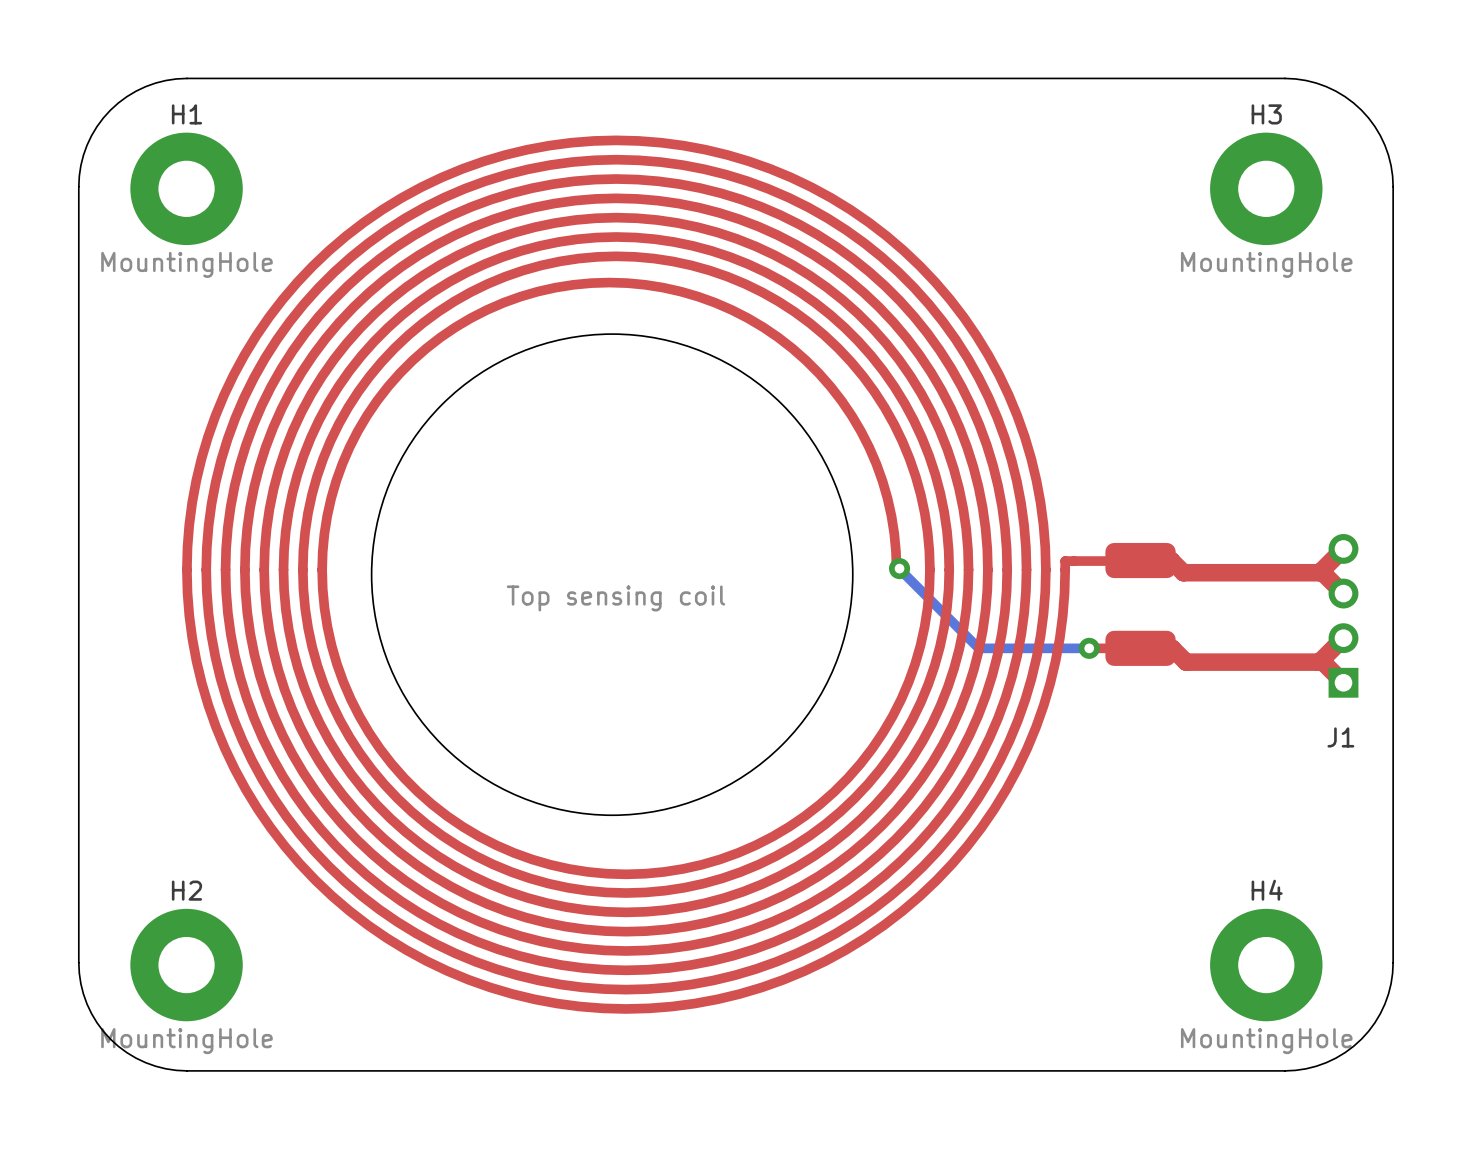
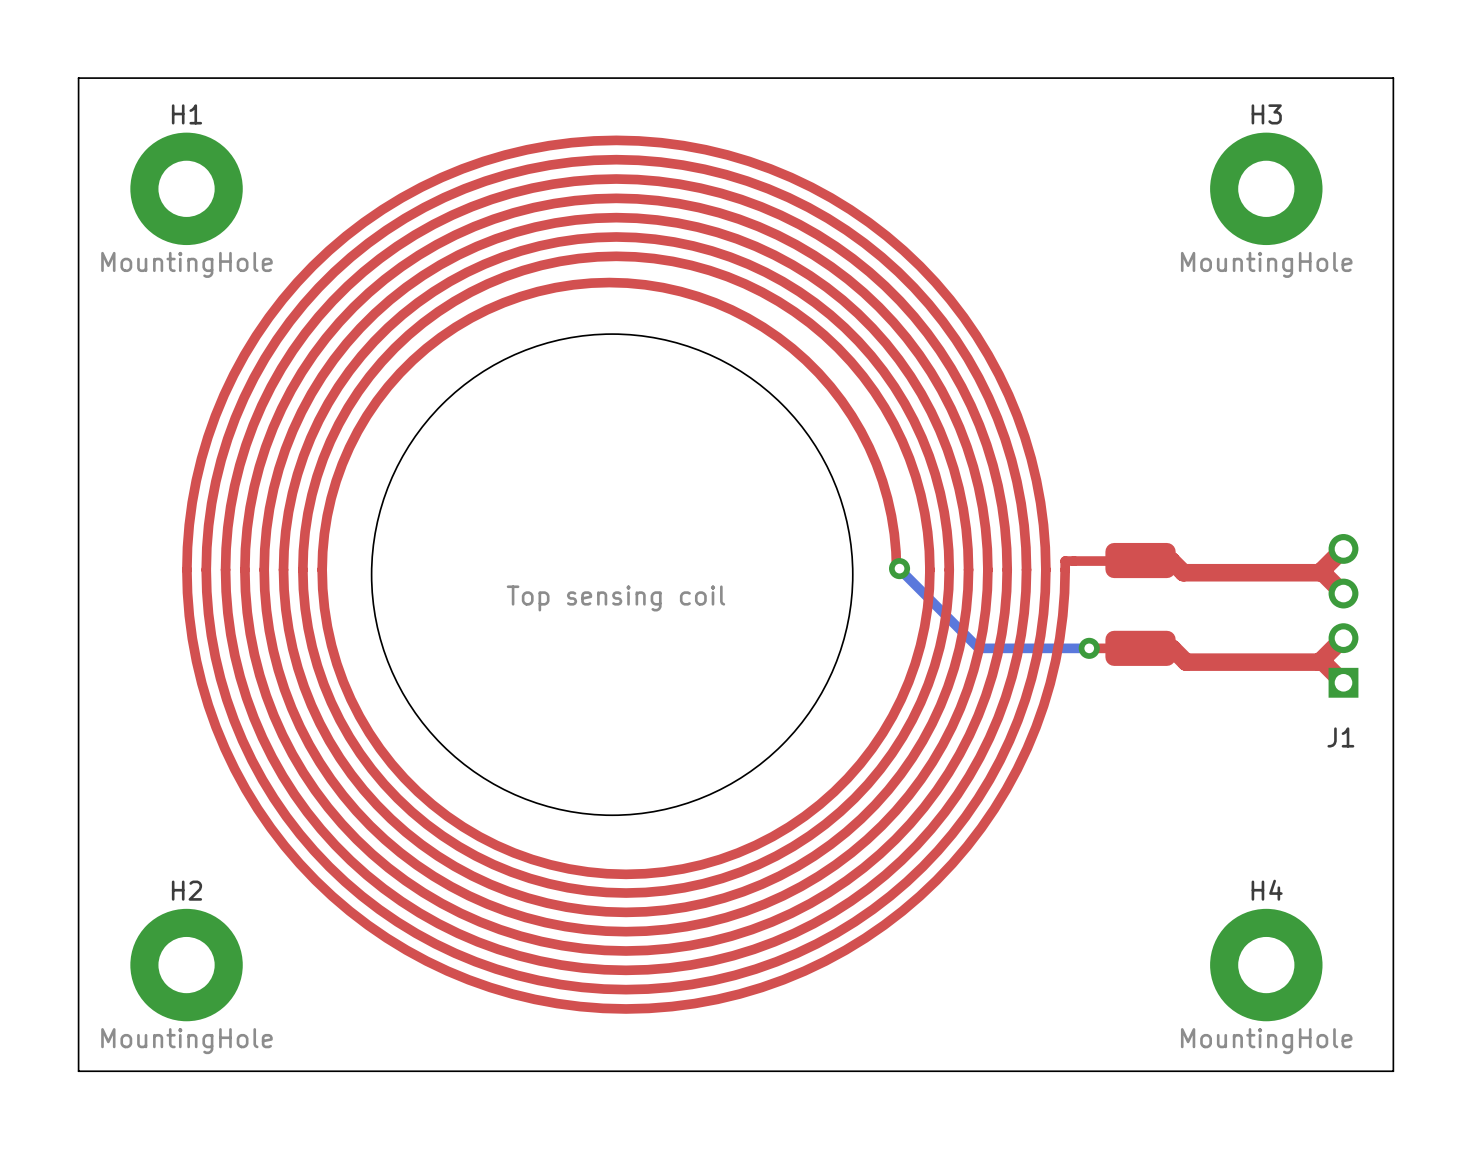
board edge: (187, 78) (1284, 78) (1316, 83) (1335, 91) (1353, 103) (1374, 126) (1384, 145) (1391, 165) (1393, 186) (1393, 962) (1388, 994) (1380, 1013) (1368, 1031) (1353, 1046) (1326, 1062) (1306, 1068) (1284, 1070) (187, 1070) (155, 1066) (136, 1058) (118, 1046) (103, 1031) (91, 1013) (80, 983) (78, 962) (79, 176) (83, 155) (91, 135) (103, 118) (118, 102) (136, 91) (155, 83) (187, 78) -> (78, 78) (78, 1071) (1393, 1071) (1393, 78) (78, 78)

